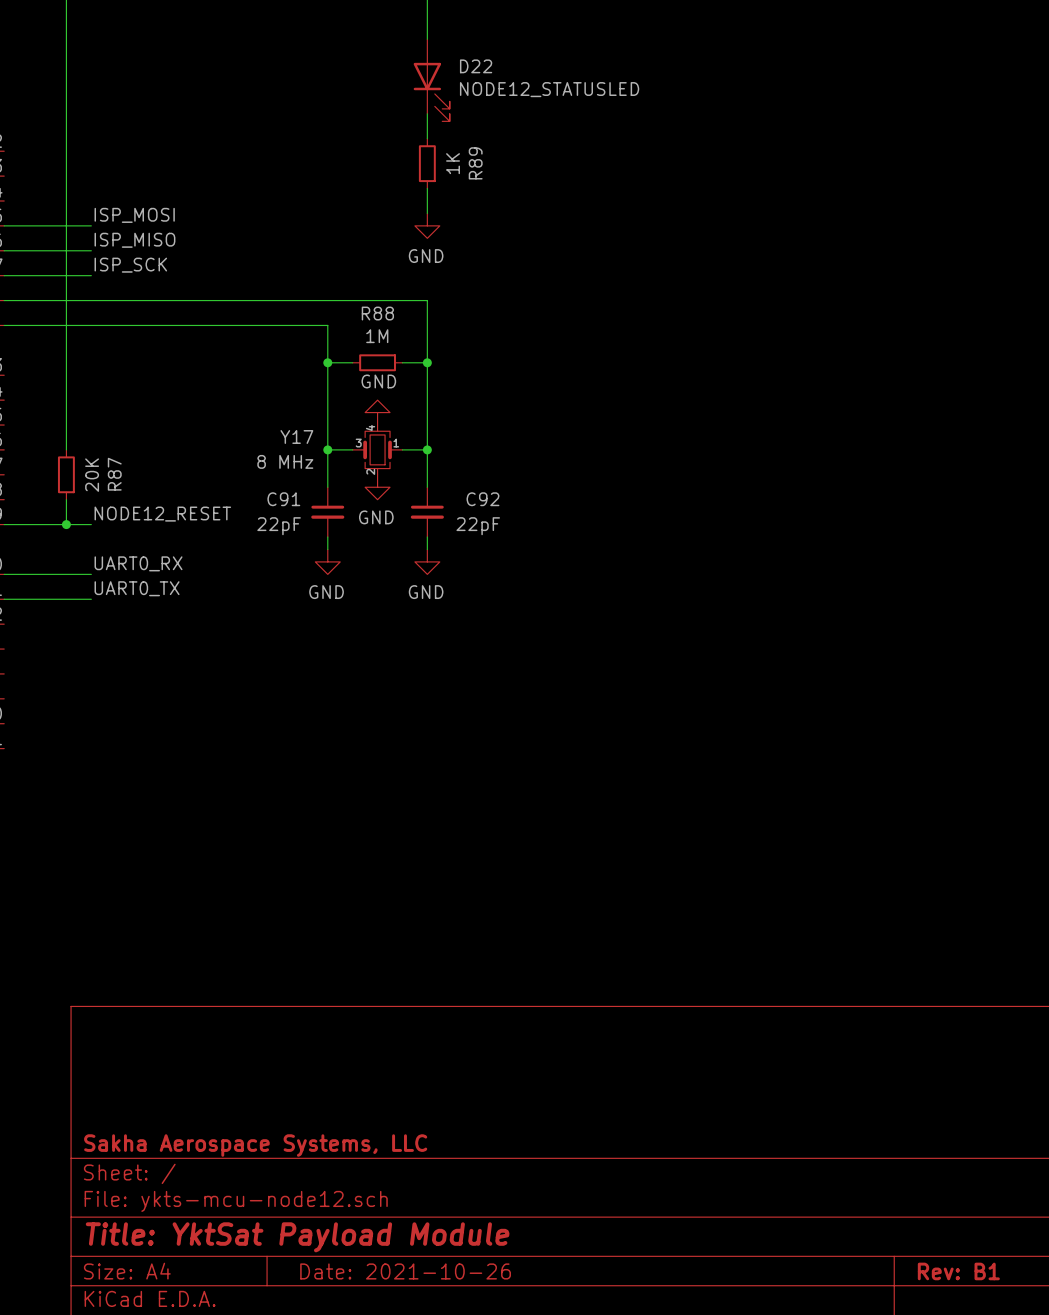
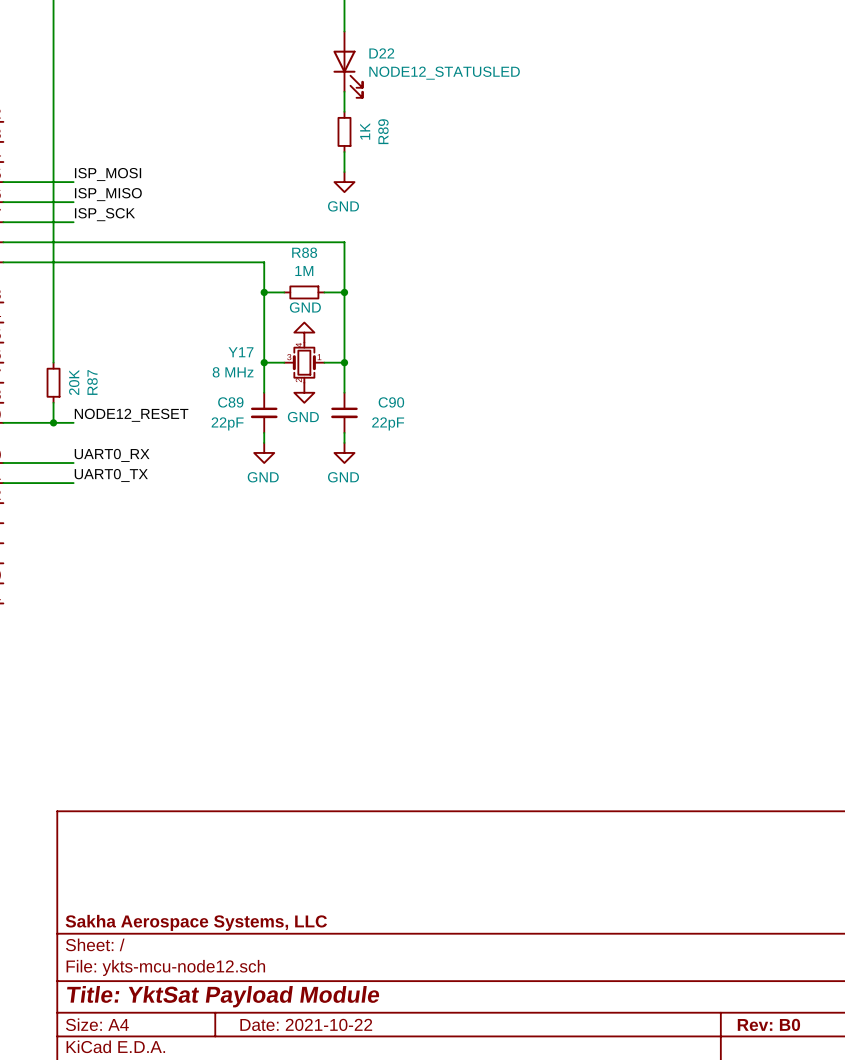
C91 name: C91 (283, 499) -> C89 (230, 402)
C92 name: C92 (482, 499) -> C90 (391, 402)
title block: Date: 2021-10-26 (405, 1271) -> Date: 2021-10-22 (306, 1024)
title block: Rev: B1 (958, 1271) -> Rev: B0 (768, 1024)

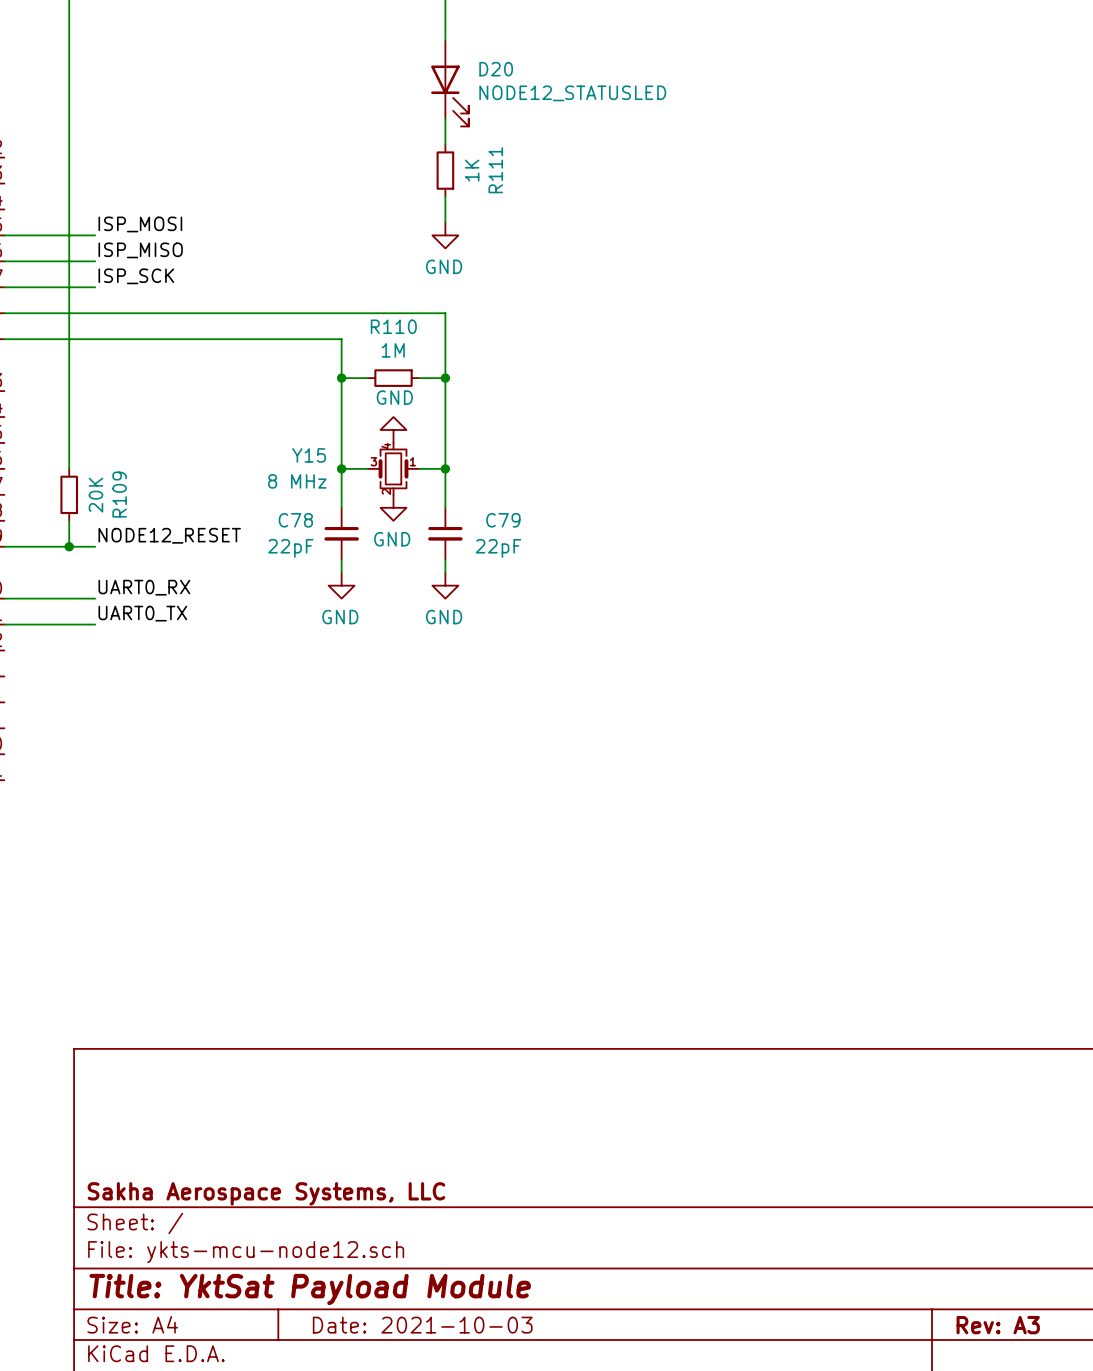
D22 name: D22 (381, 53) -> D20 (496, 69)
R89 name: R89 (383, 131) -> R111 (495, 170)
R88 name: R88 (304, 252) -> R110 (393, 326)
Y17 name: Y17 (241, 352) -> Y15 (309, 455)
R87 name: R87 (92, 382) -> R109 (119, 494)
C89 name: C89 (230, 402) -> C78 (295, 520)
C90 name: C90 (391, 402) -> C79 (503, 520)
title block: Date: 2021-10-22 (306, 1024) -> Date: 2021-10-03 (422, 1325)
title block: Rev: B0 (768, 1024) -> Rev: A3 (998, 1325)

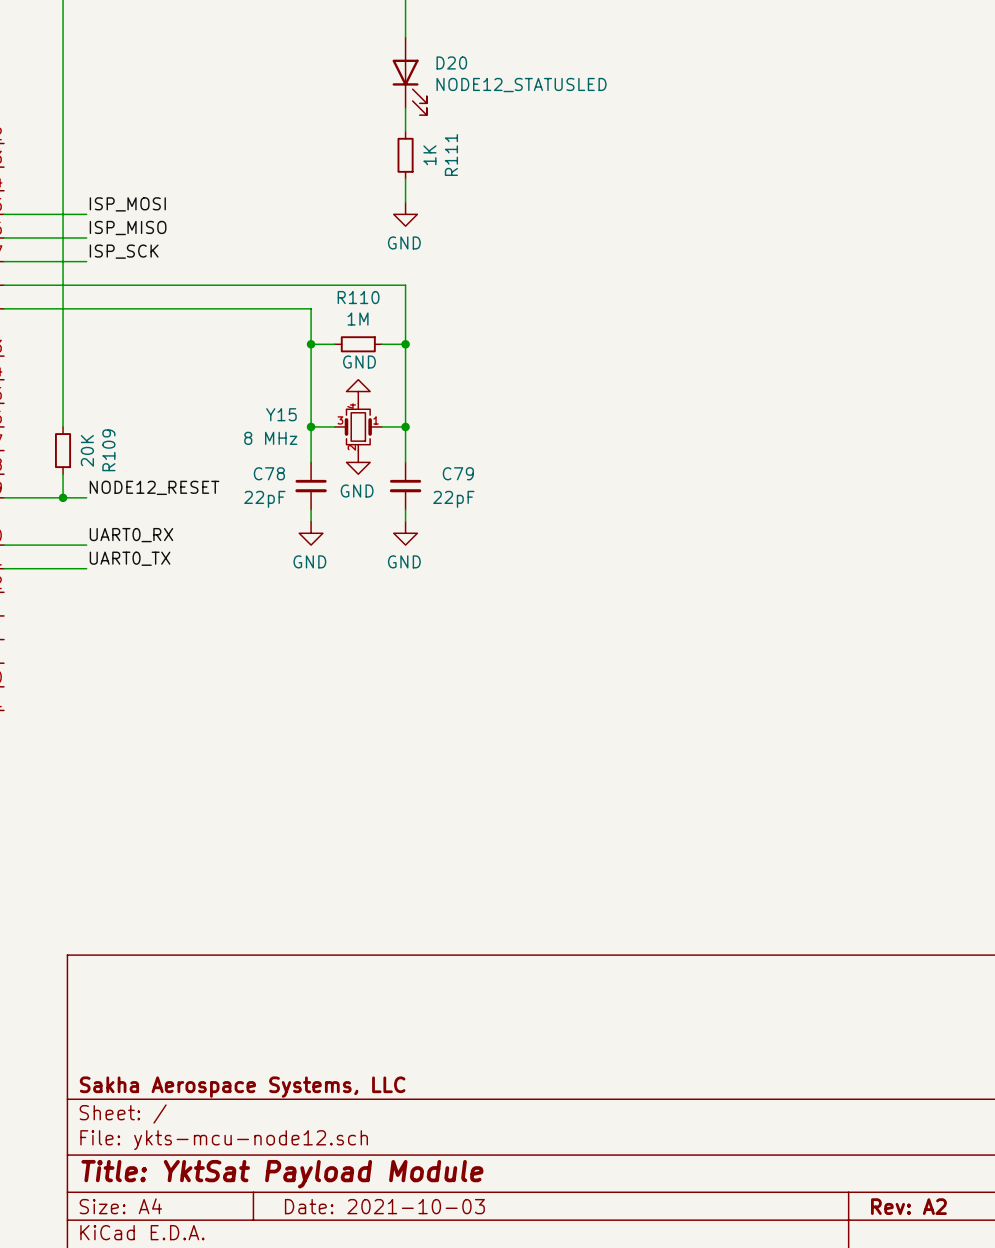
title block: Rev: A3 (998, 1325) -> Rev: A2 (908, 1206)

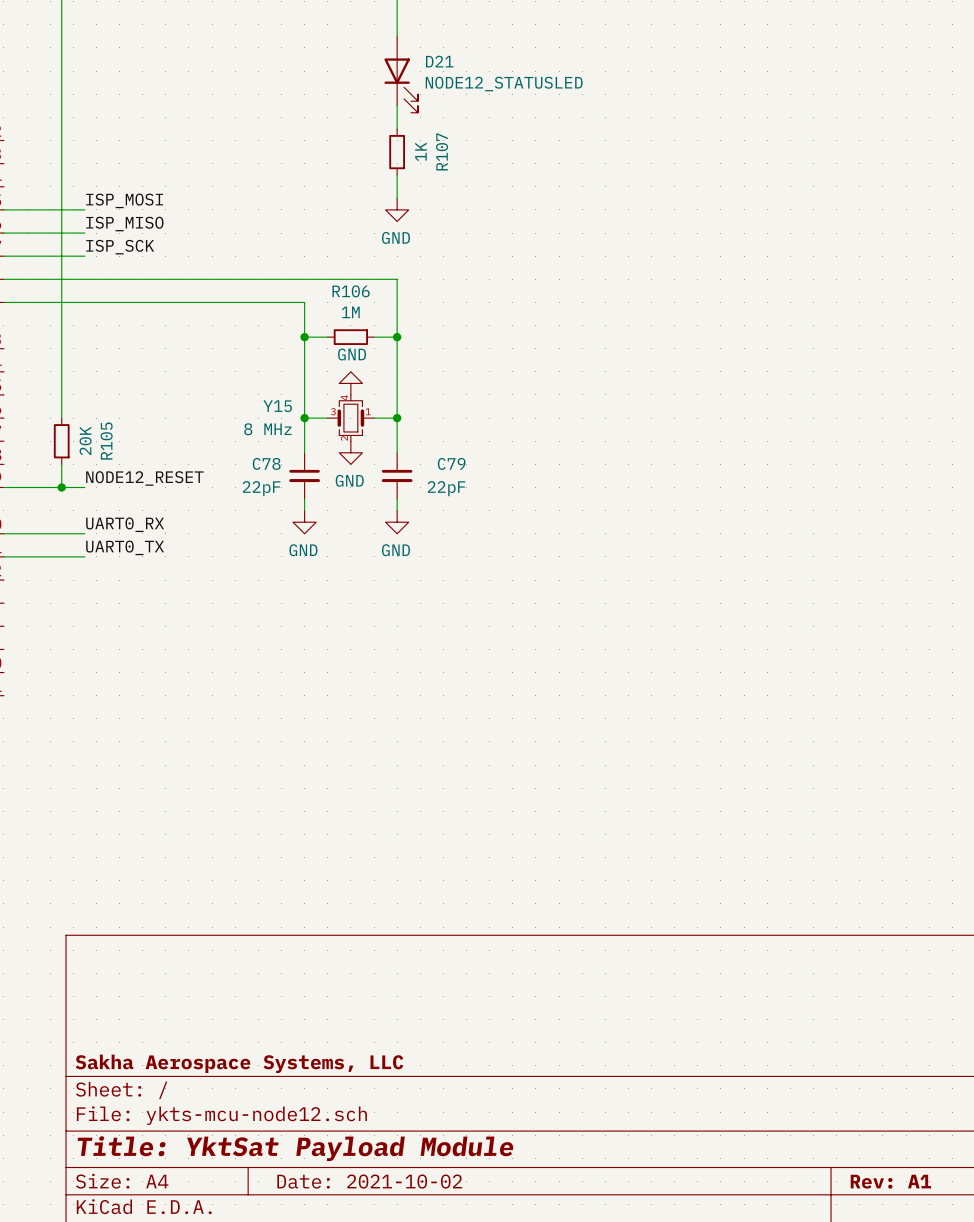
D20 name: D20 (451, 62) -> D21 (439, 61)
R111 name: R111 (451, 155) -> R107 (442, 151)
R110 name: R110 (358, 297) -> R106 (351, 291)
R109 name: R109 (108, 450) -> R105 (106, 441)
title block: Date: 2021-10-03 (384, 1206) -> Date: 2021-10-02 (369, 1181)
title block: Rev: A2 (908, 1206) -> Rev: A1 (890, 1181)

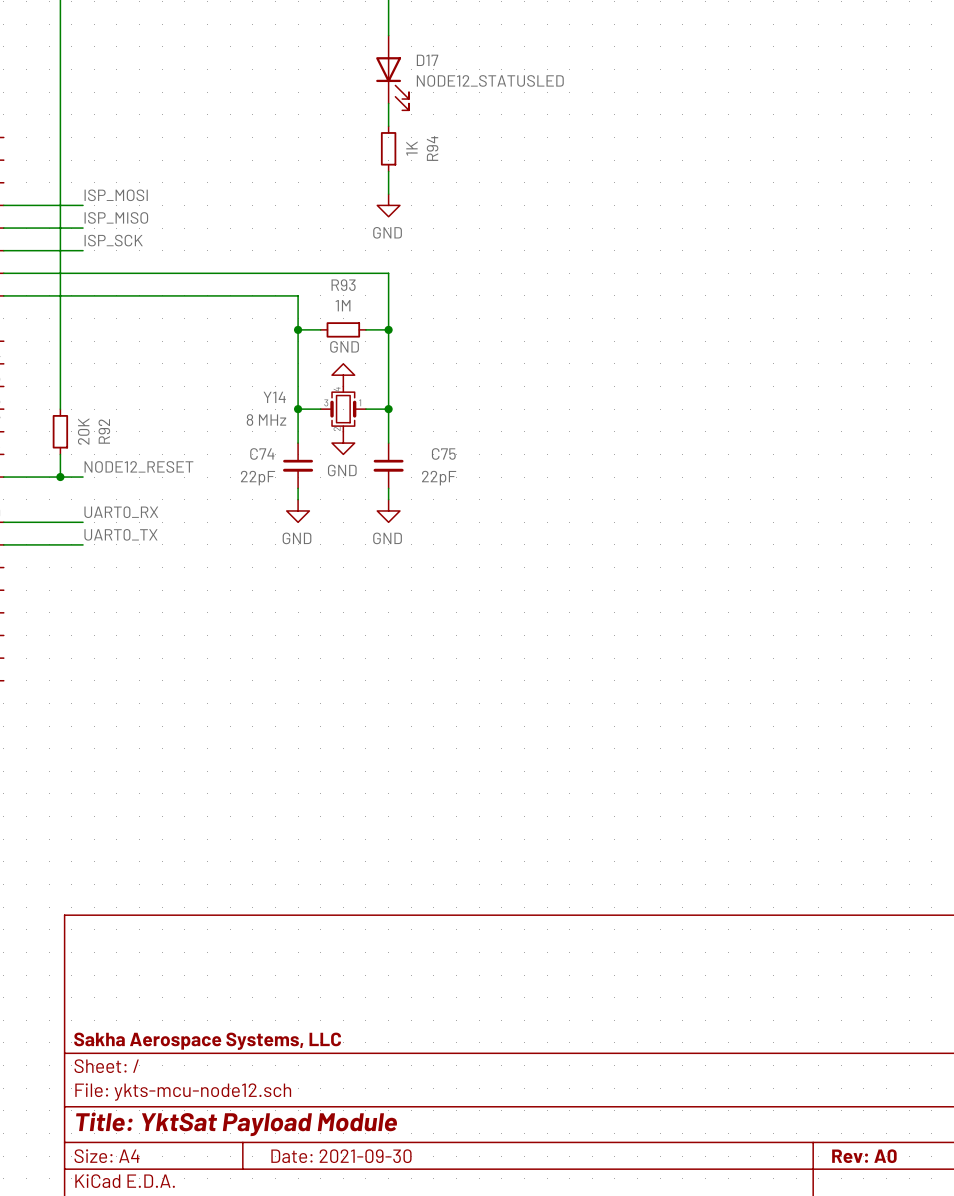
D21 name: D21 (439, 61) -> D17 (427, 60)
R107 name: R107 (442, 151) -> R94 (432, 148)
R106 name: R106 (351, 291) -> R93 (343, 285)
Y15 name: Y15 (277, 406) -> Y14 (274, 397)
R105 name: R105 (106, 441) -> R92 (104, 431)
C78 name: C78 (266, 463) -> C74 (262, 453)
C79 name: C79 (451, 463) -> C75 (443, 453)
title block: Date: 2021-10-02 (369, 1181) -> Date: 2021-09-30 (341, 1156)
title block: Rev: A1 (890, 1181) -> Rev: A0 (864, 1156)

